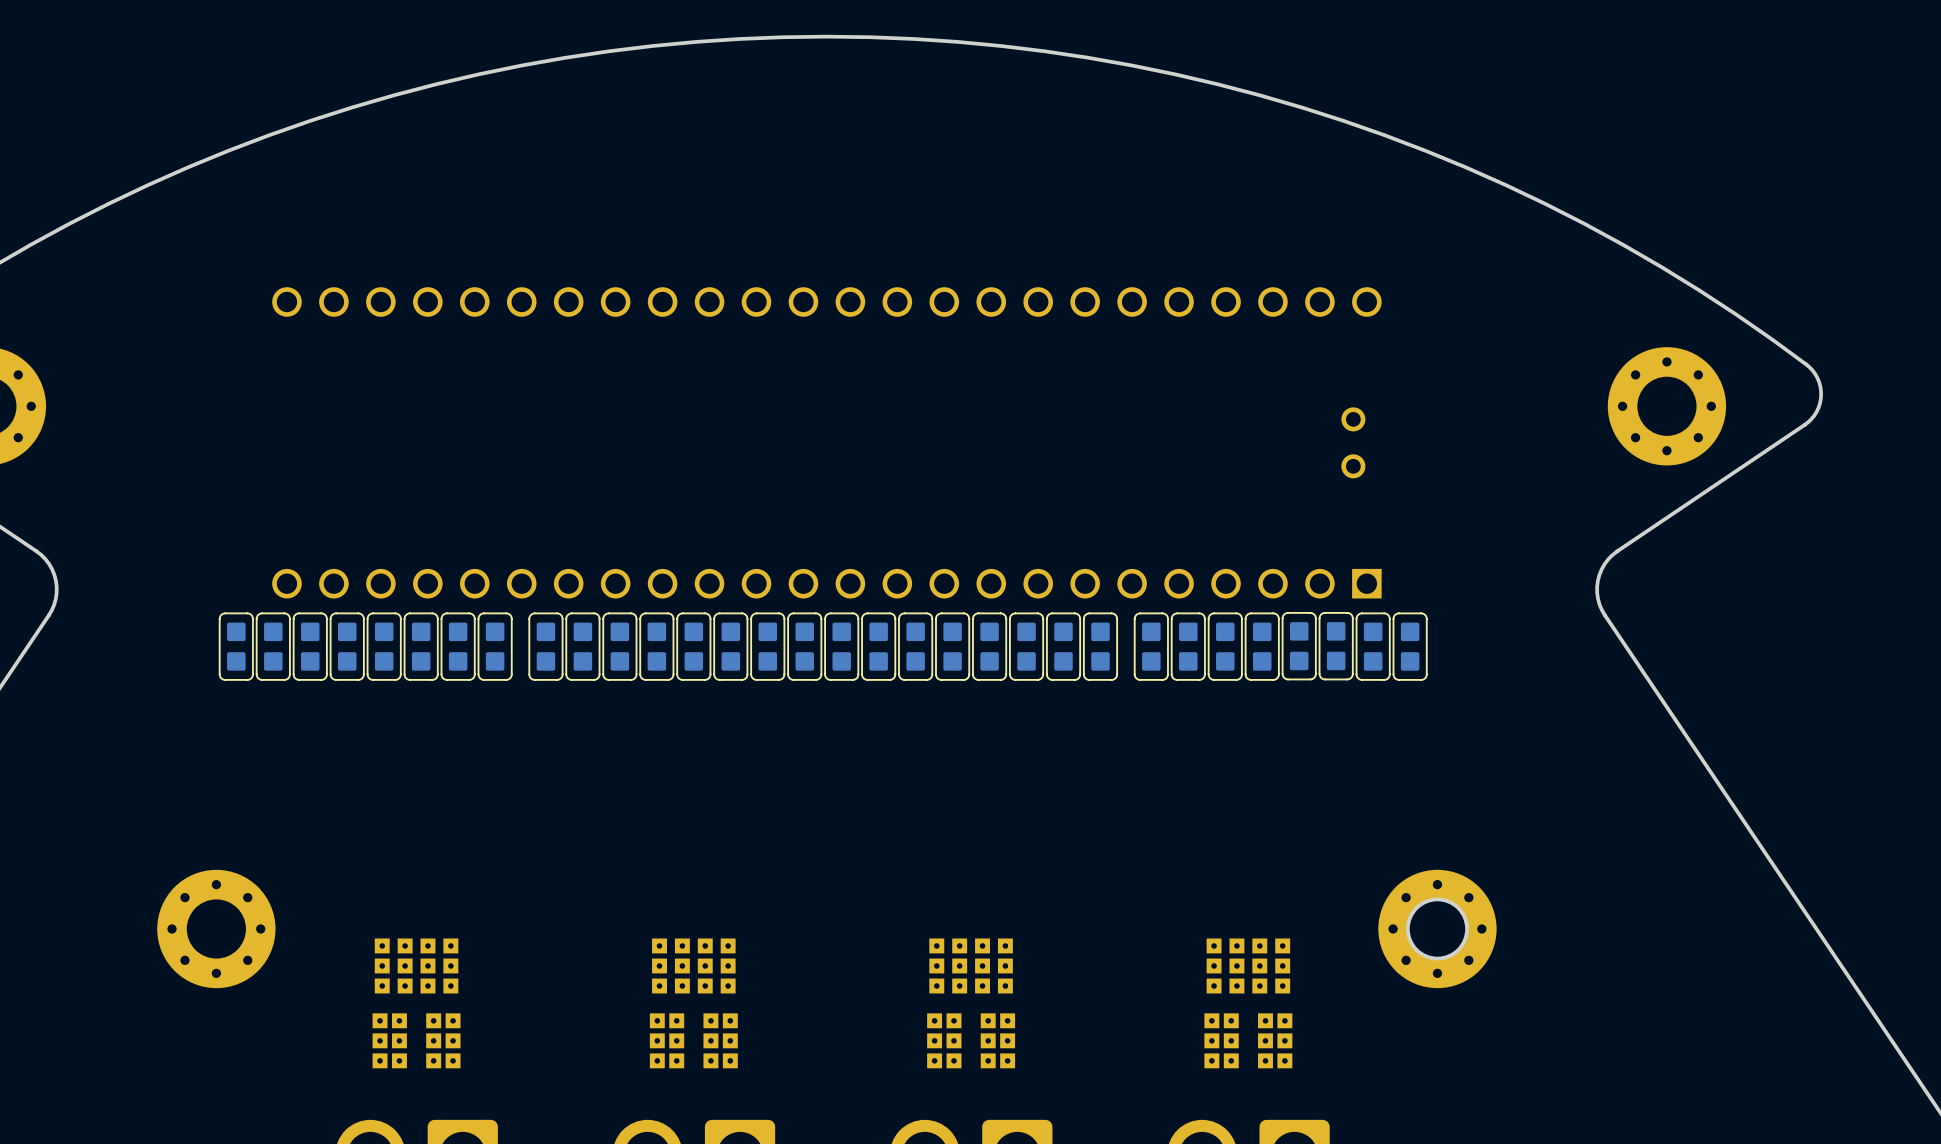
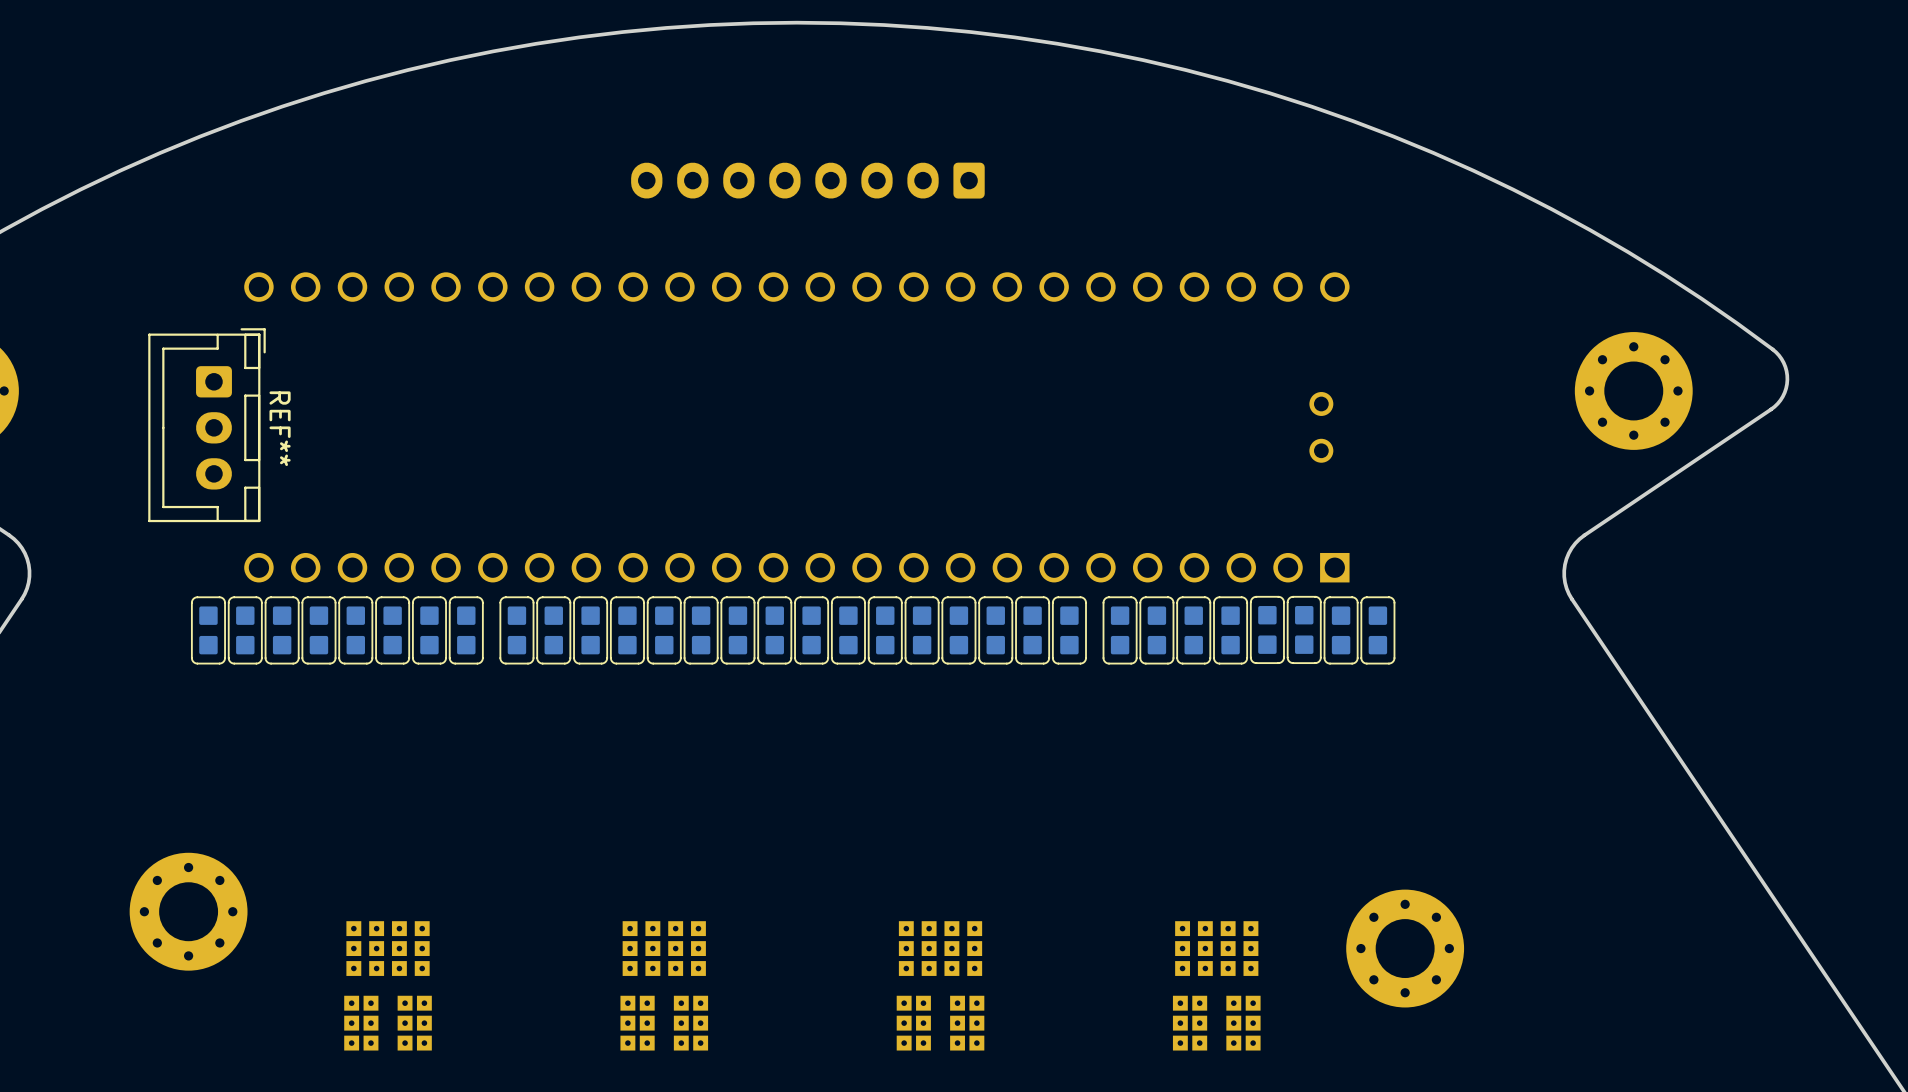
part: none -> (807, 180)
REF**: none -> (206, 425)
round board edge: [1406, 897, 1469, 961] -> none
part position: (1437, 928) -> (1405, 948)

